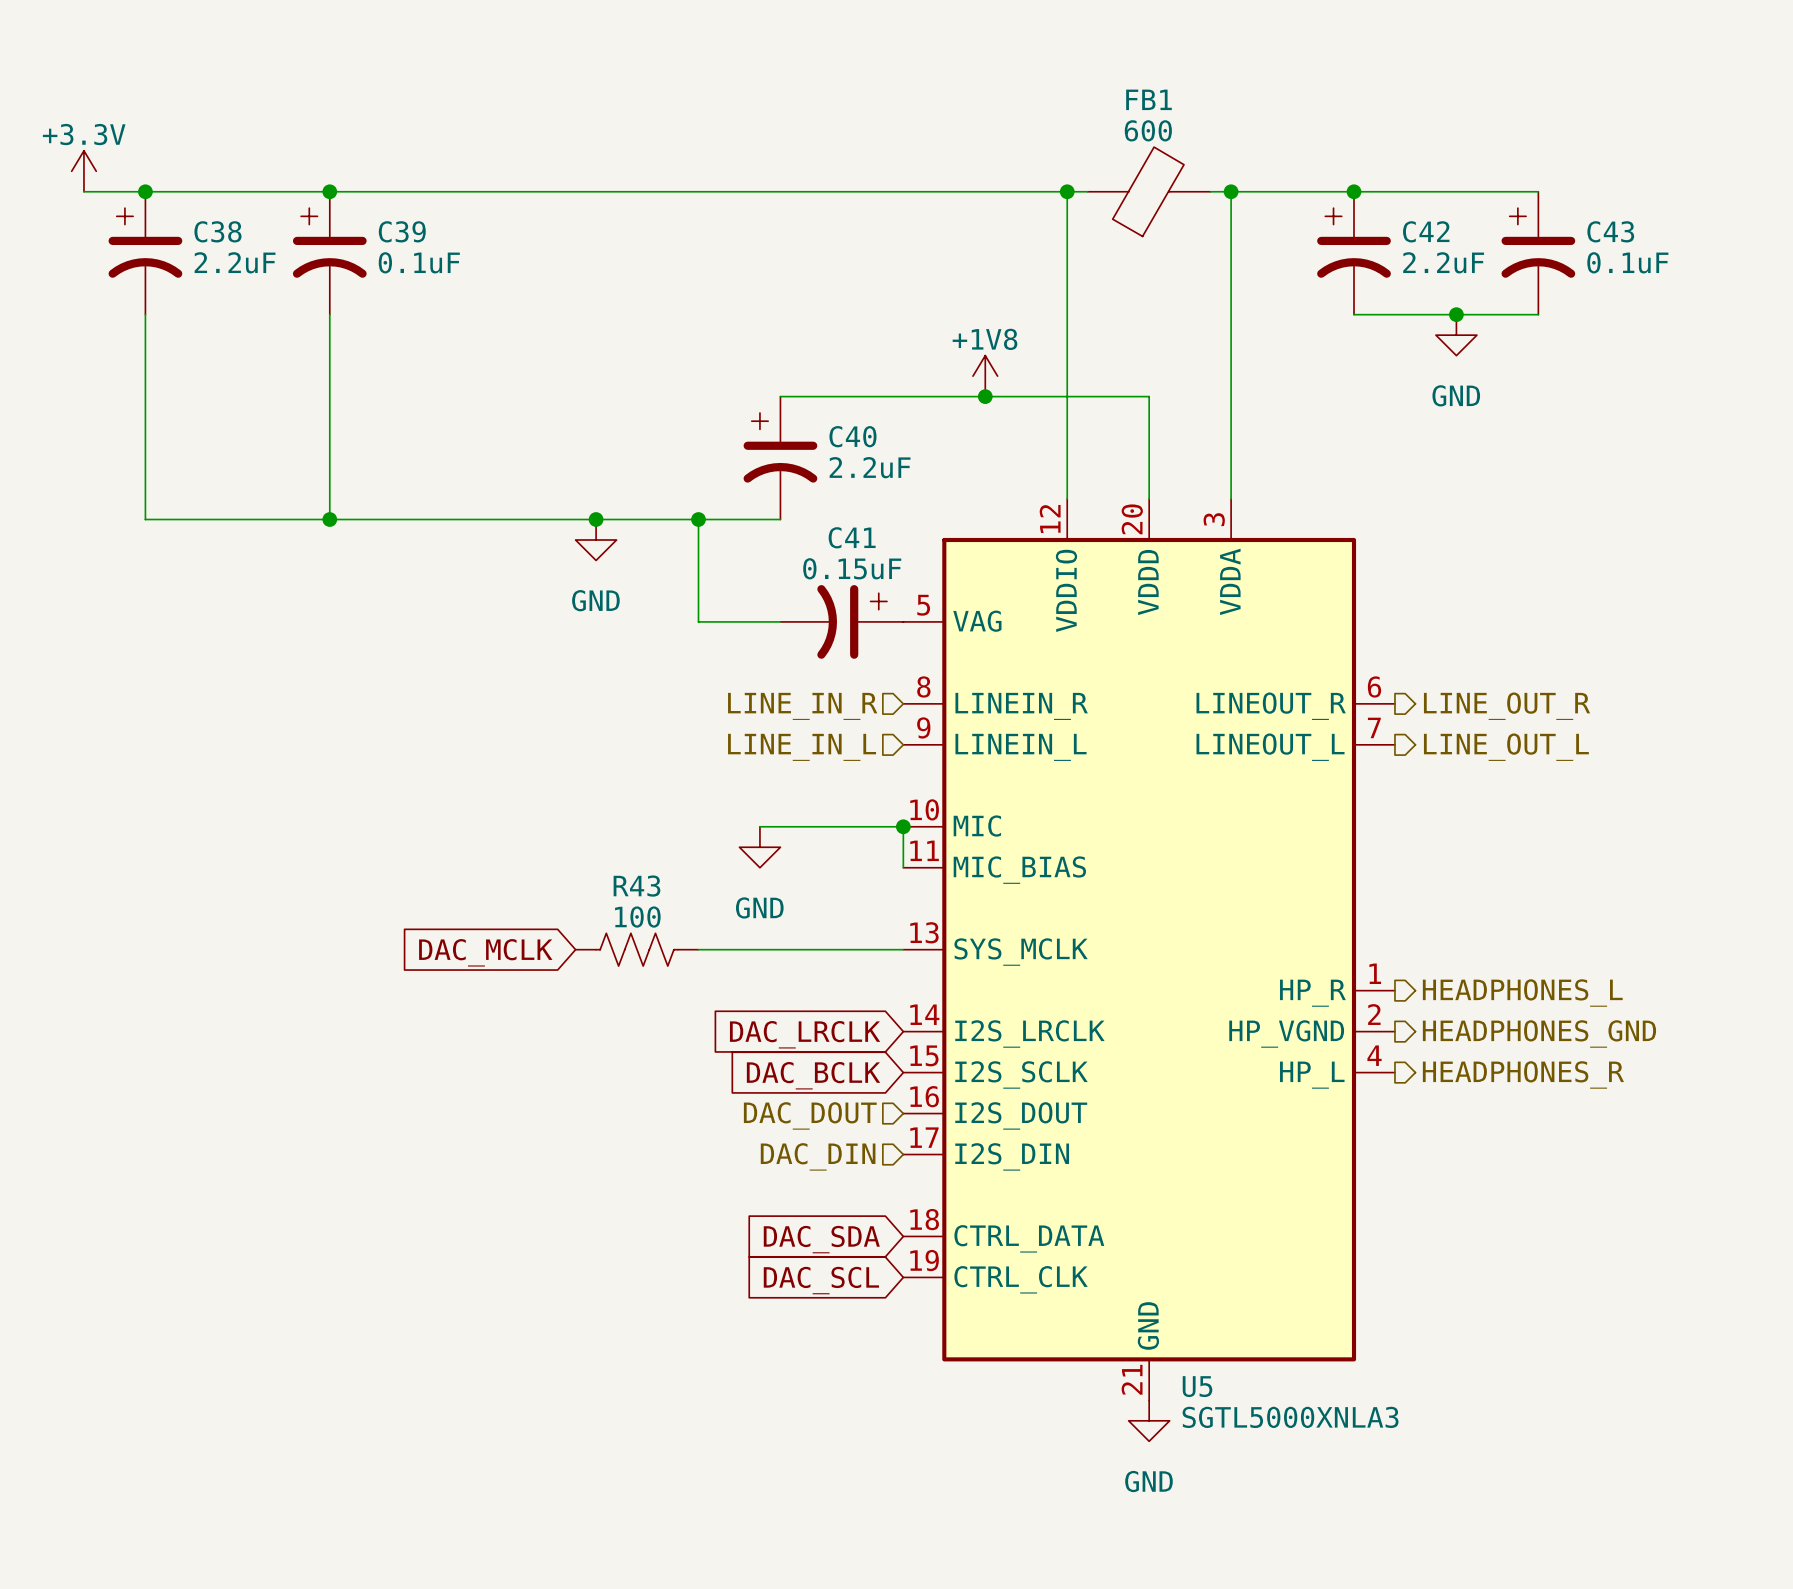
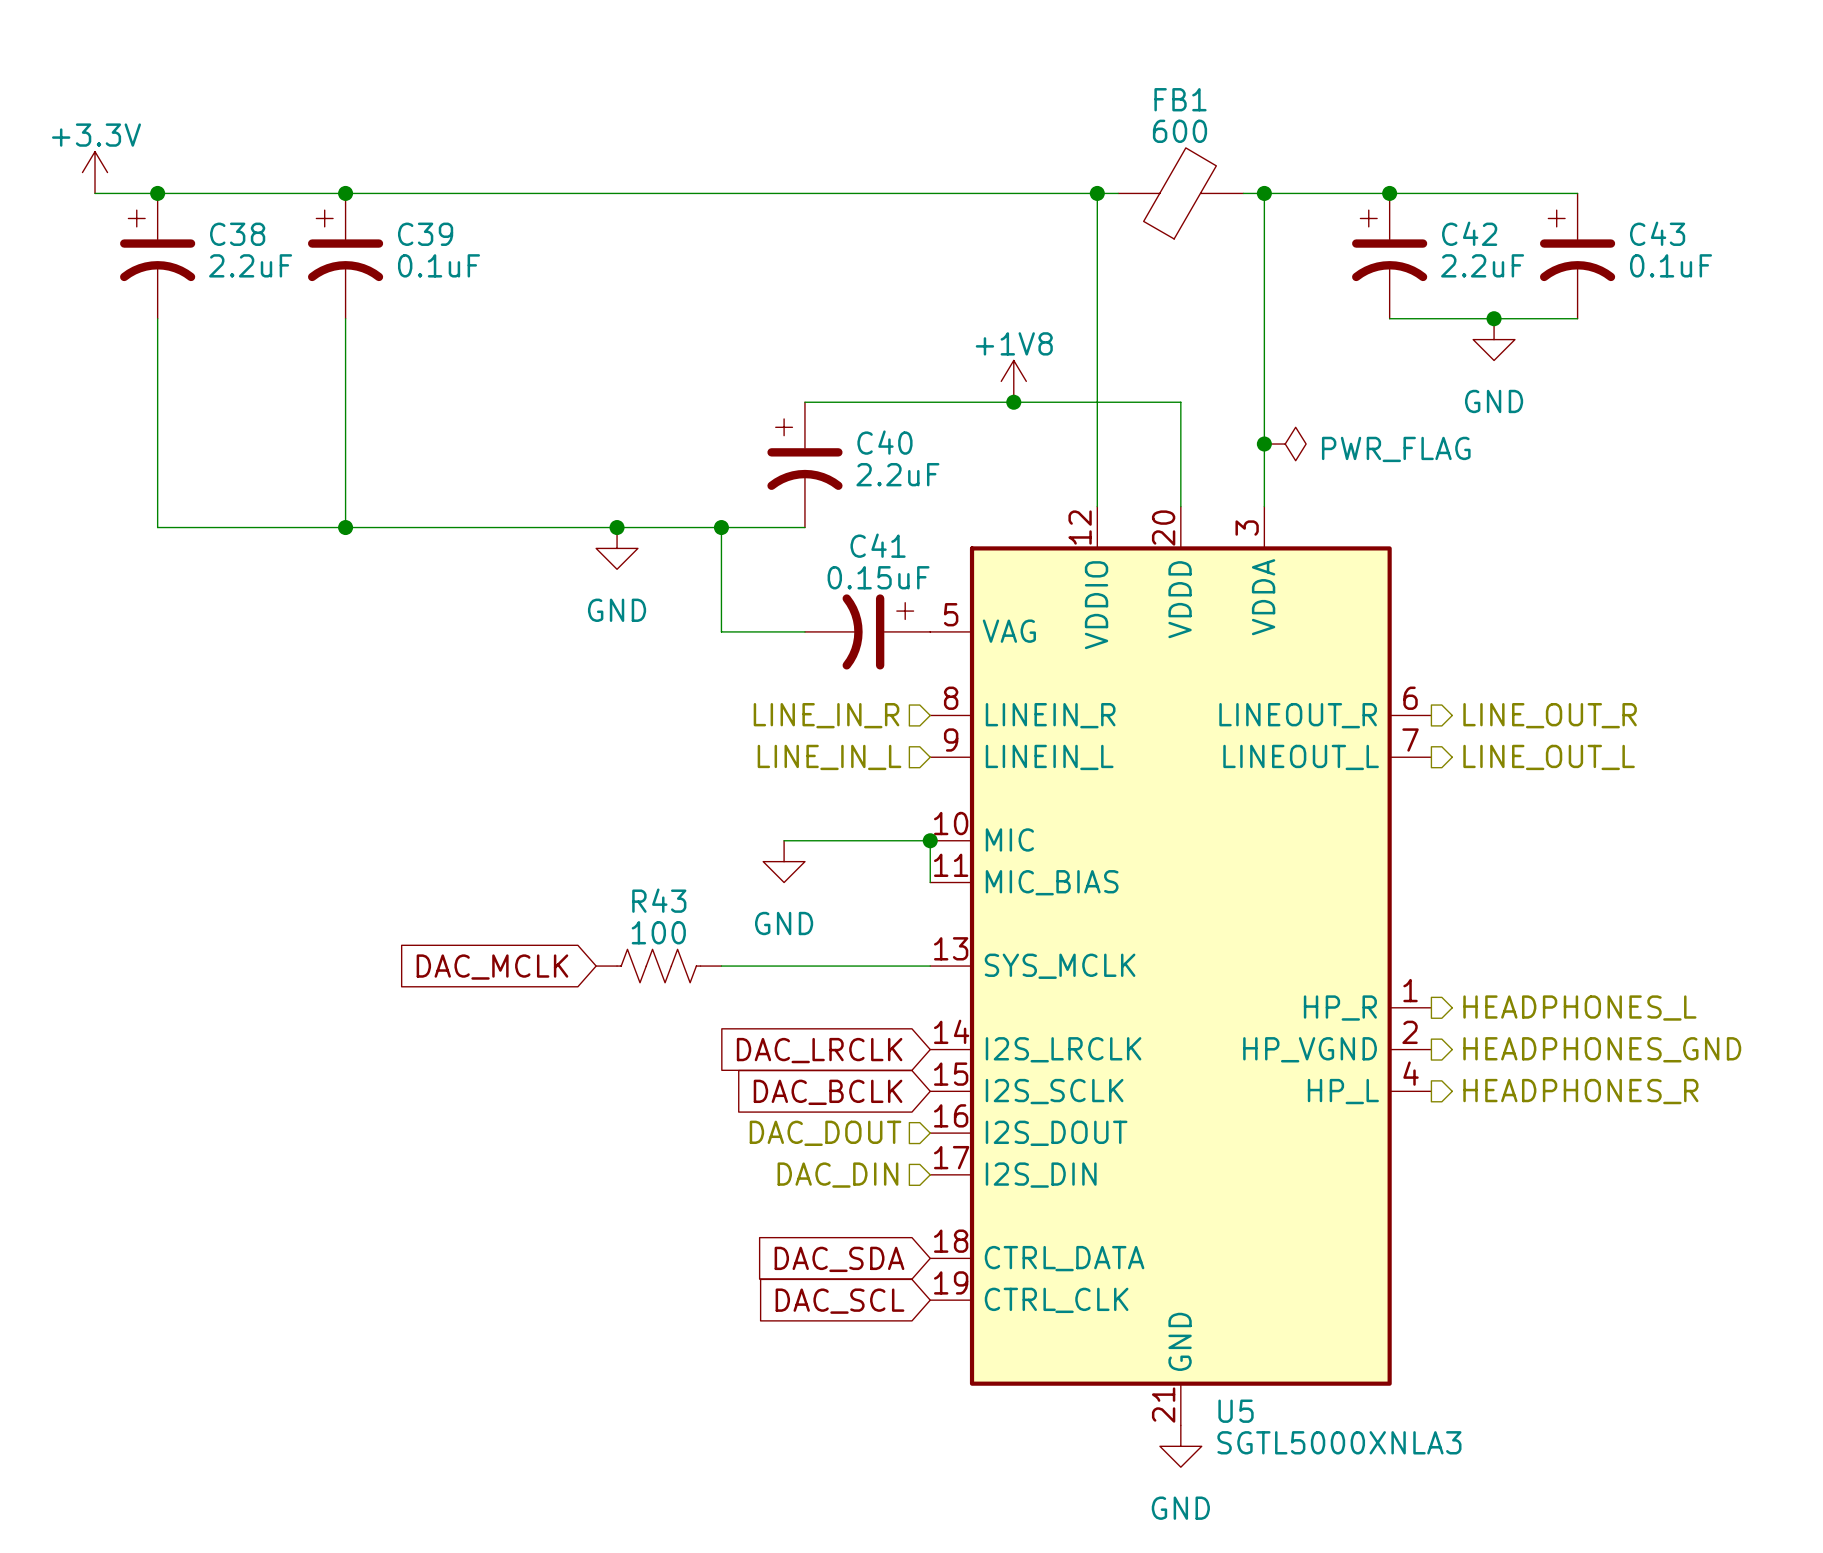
junction: none -> (1264, 444)
power symbol: none -> PWR_FLAG (1285, 444)

